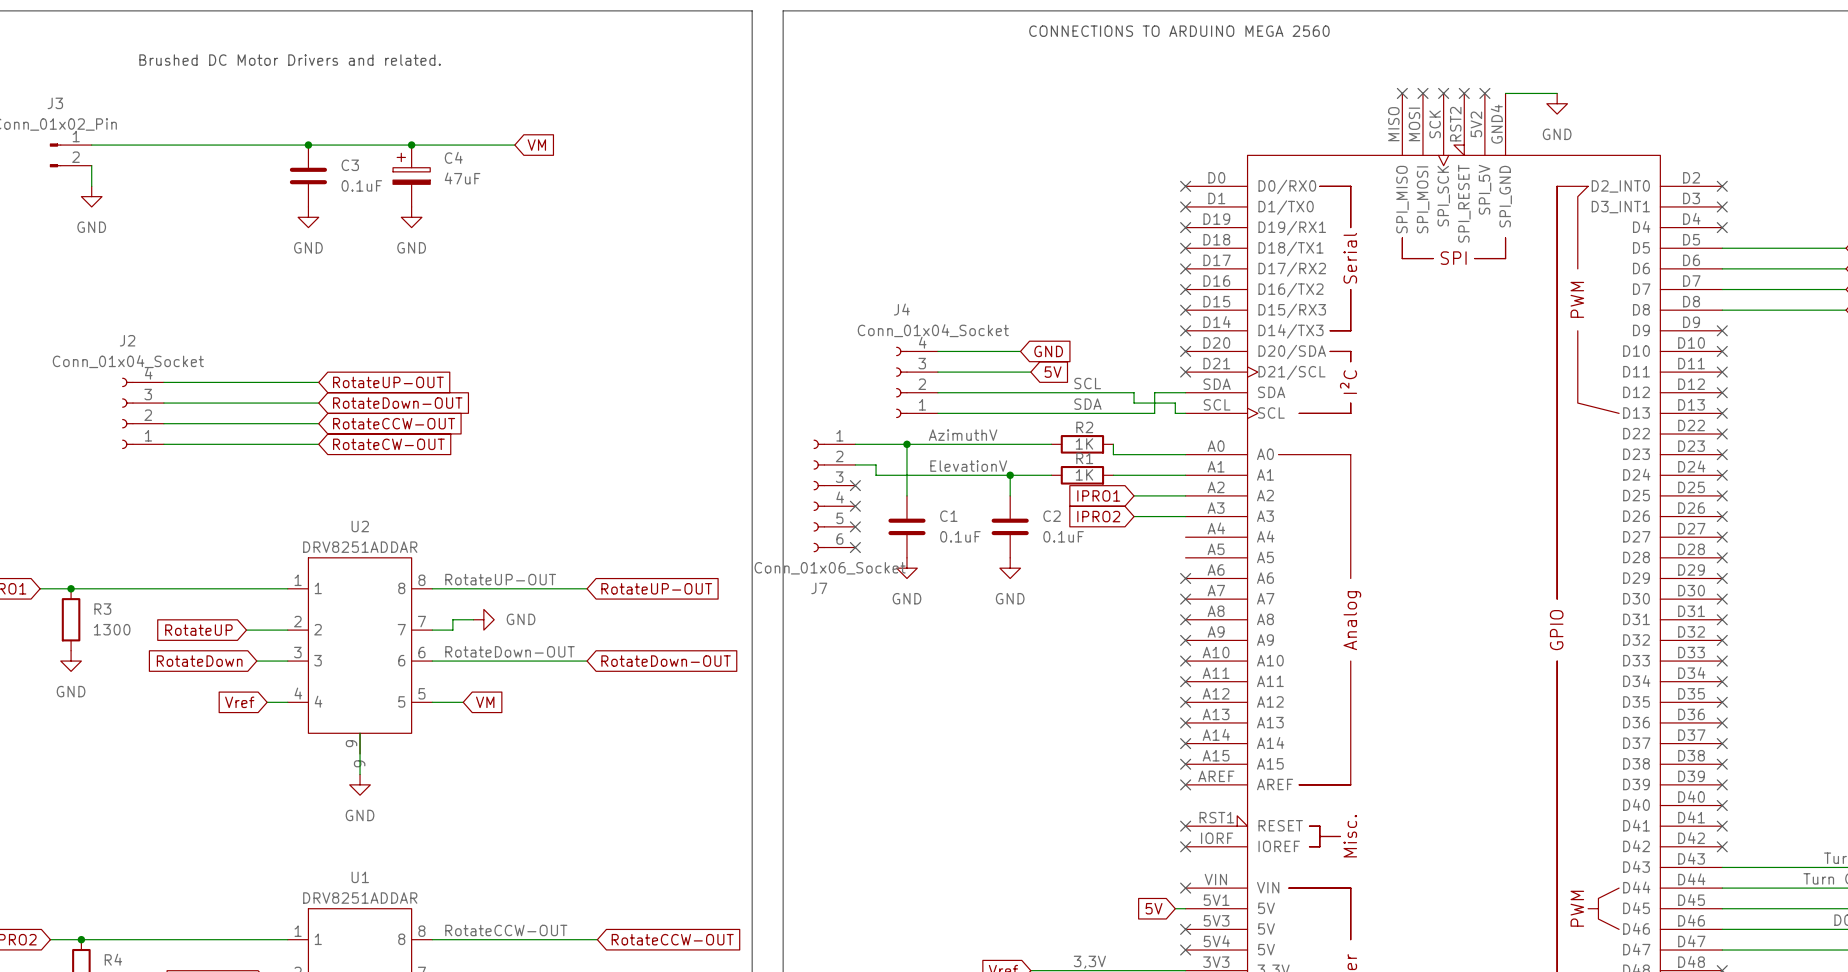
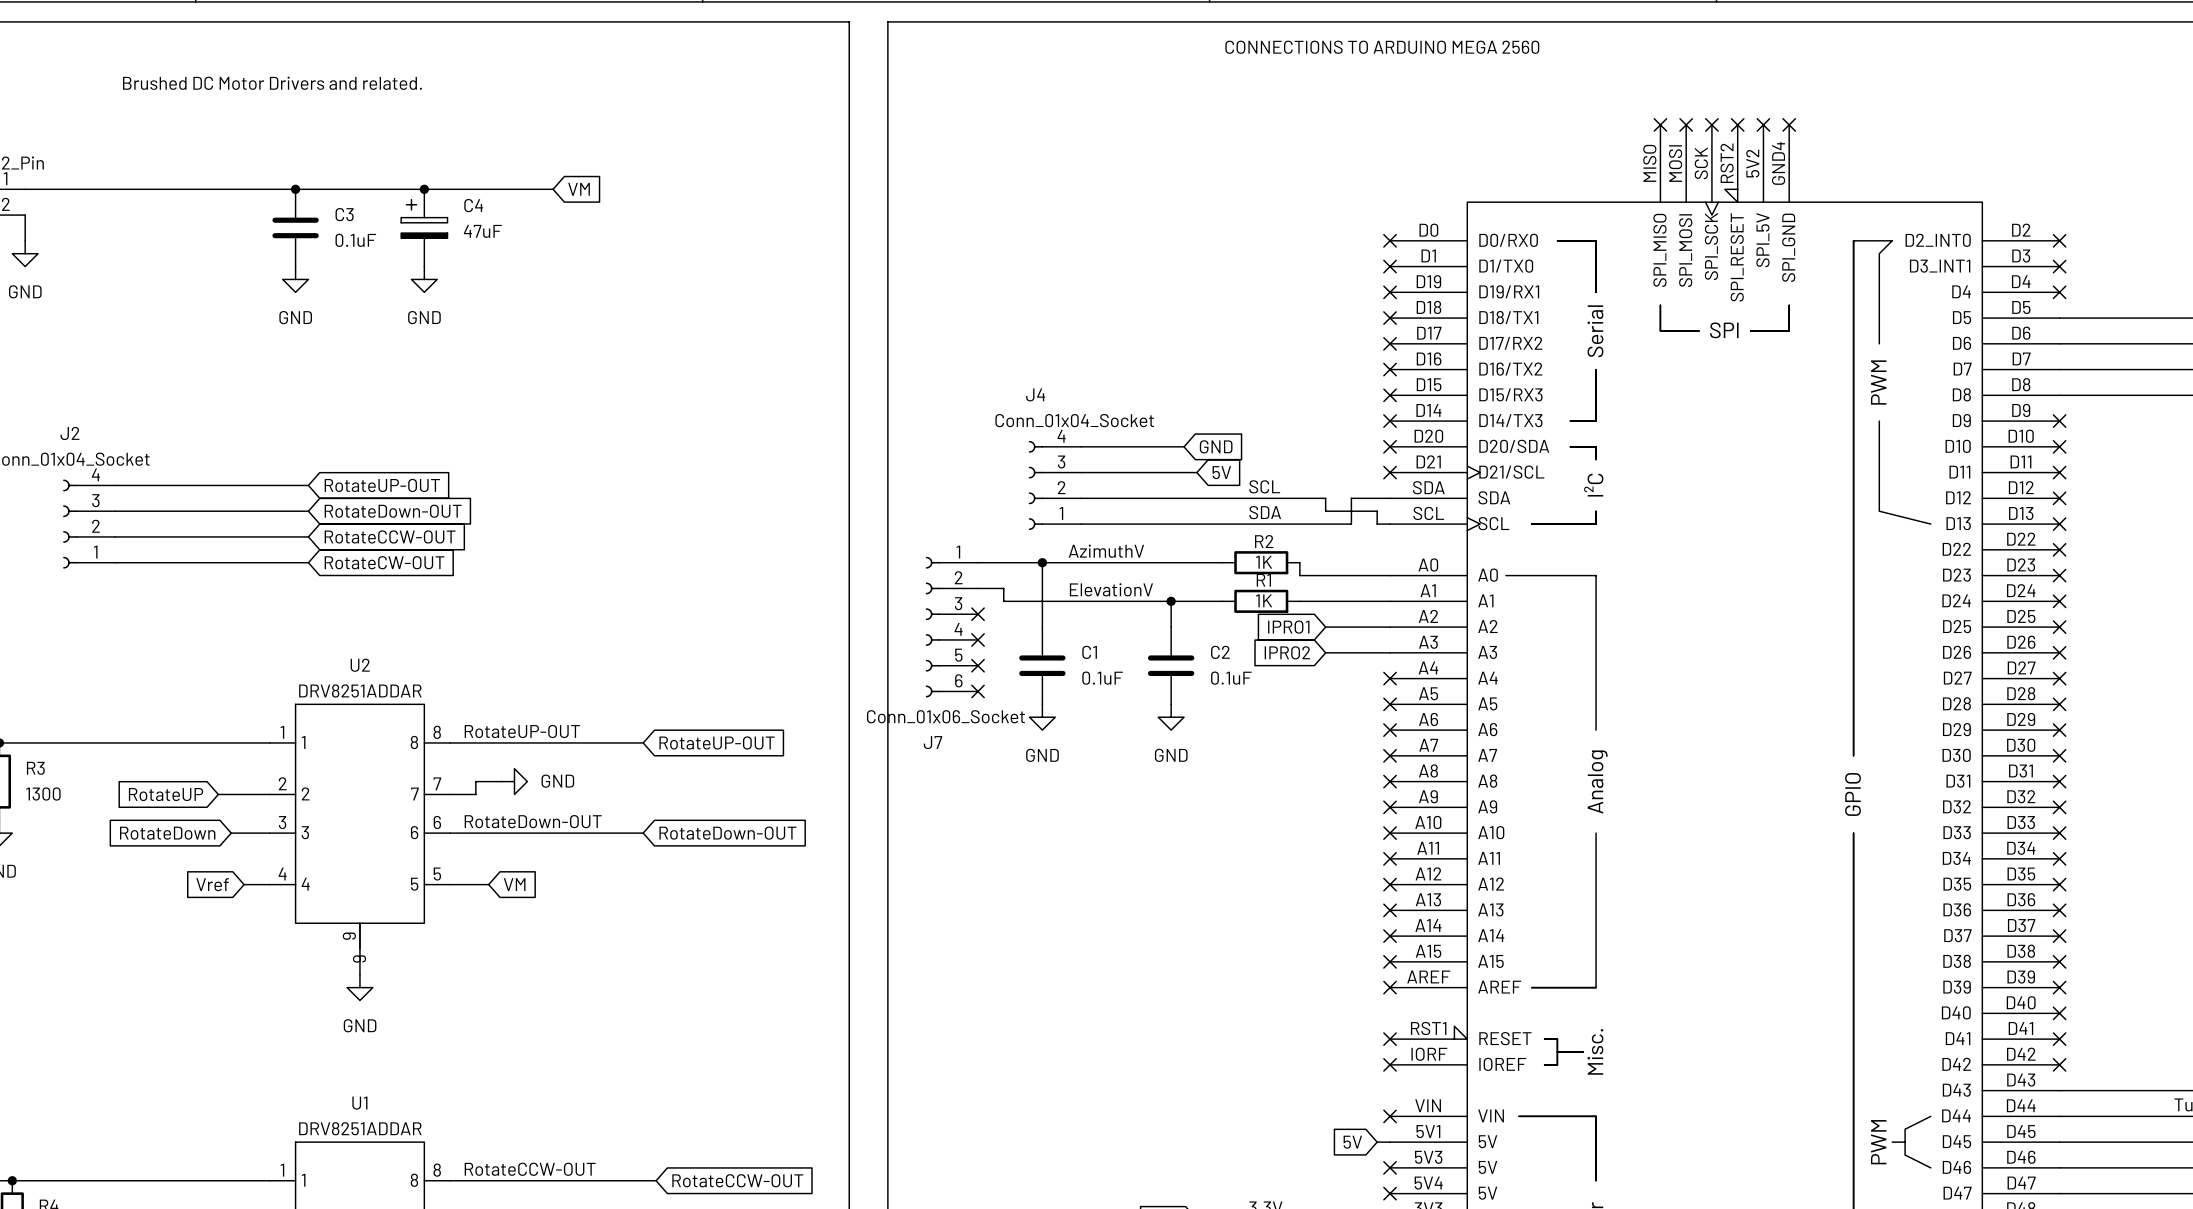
wire: (1505, 93) (1557, 93) -> none
no-connect mark: none -> (1789, 124)
power symbol: GND (1557, 103) -> none
no-connect mark: none -> (1390, 678)
no-connect mark: none -> (1390, 704)

